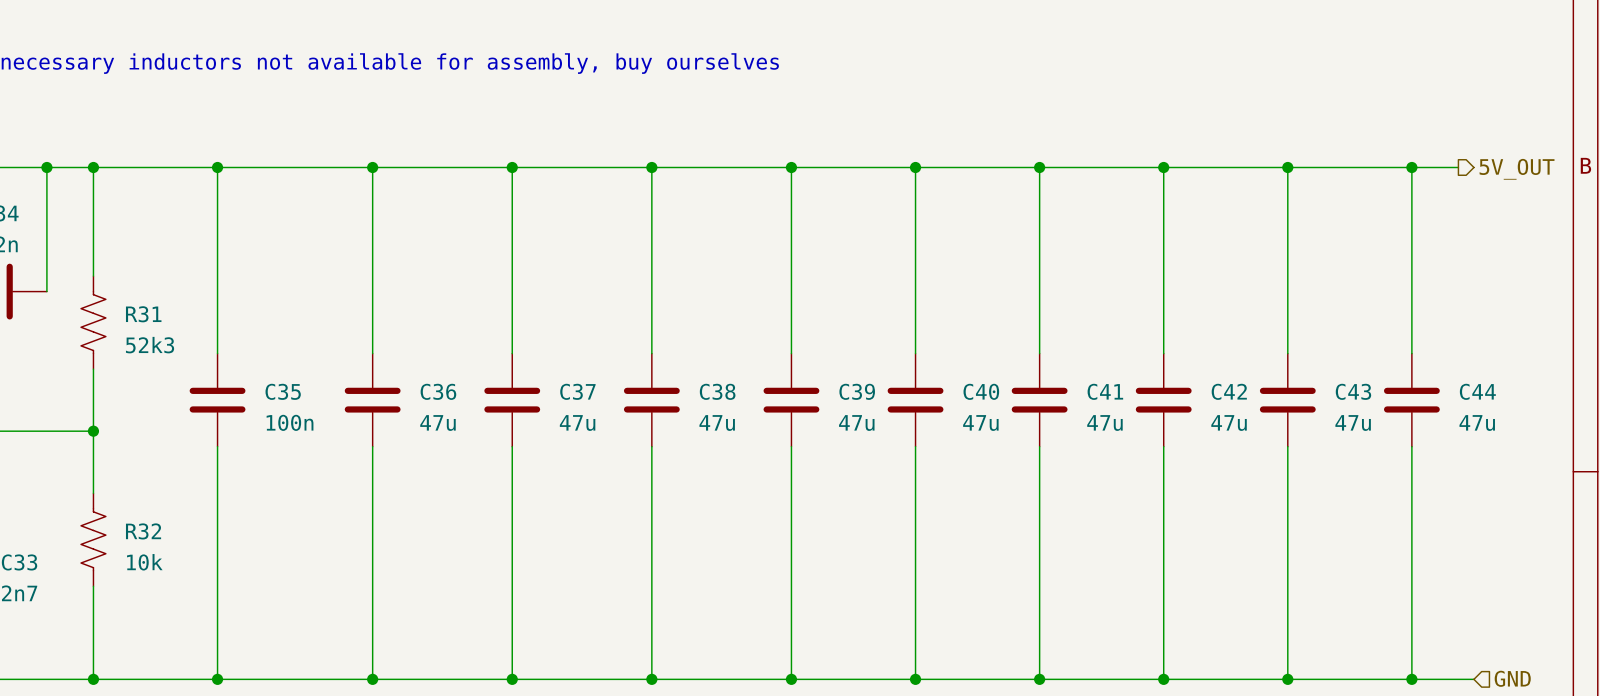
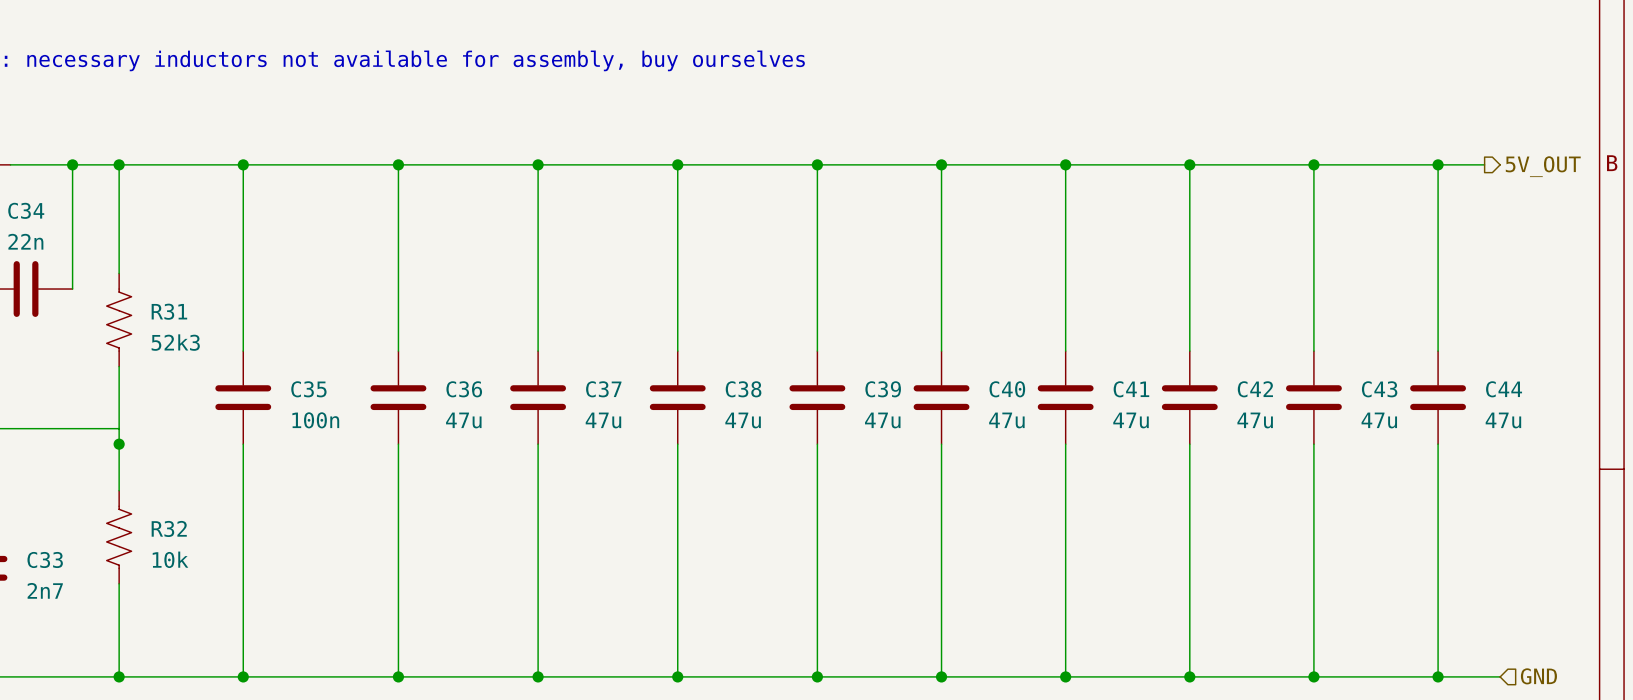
junction position: (93, 431) -> (119, 444)

